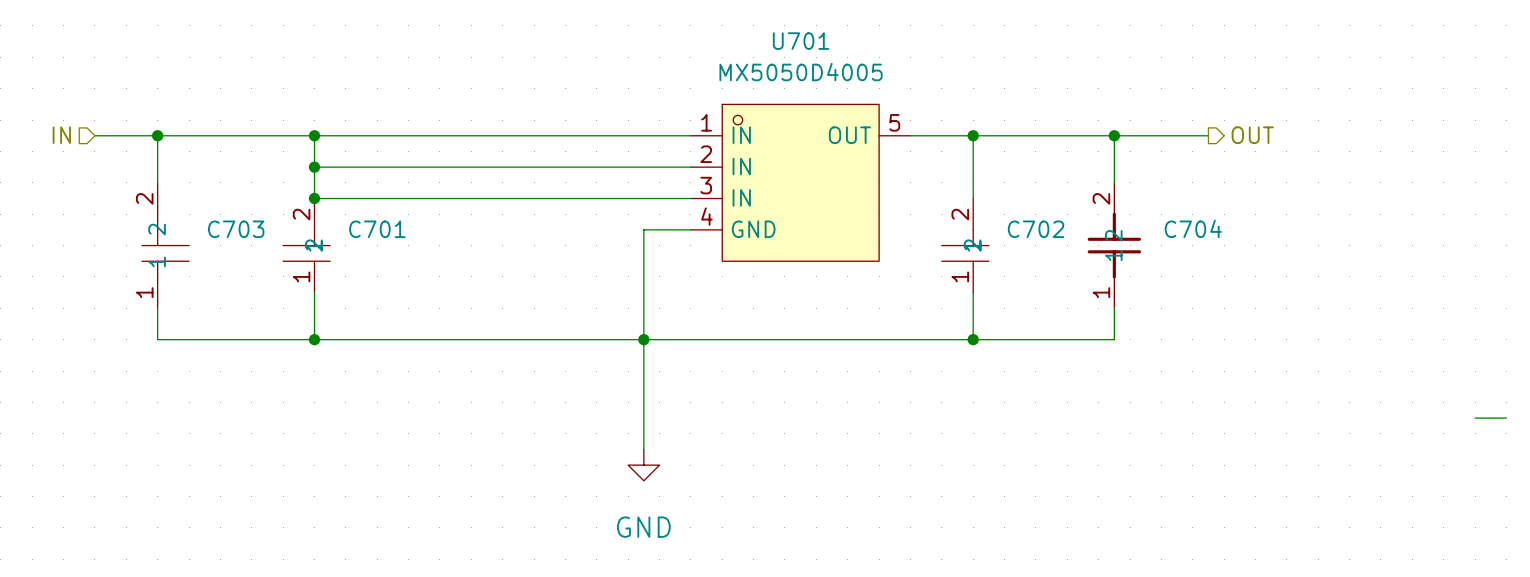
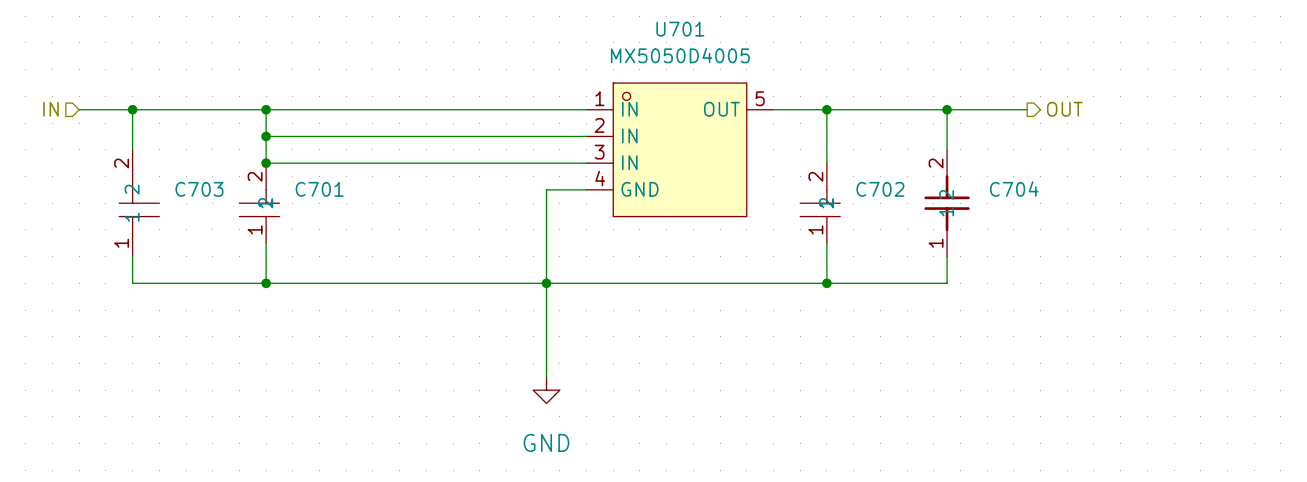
wire: (1475, 418) (1506, 418) -> none

